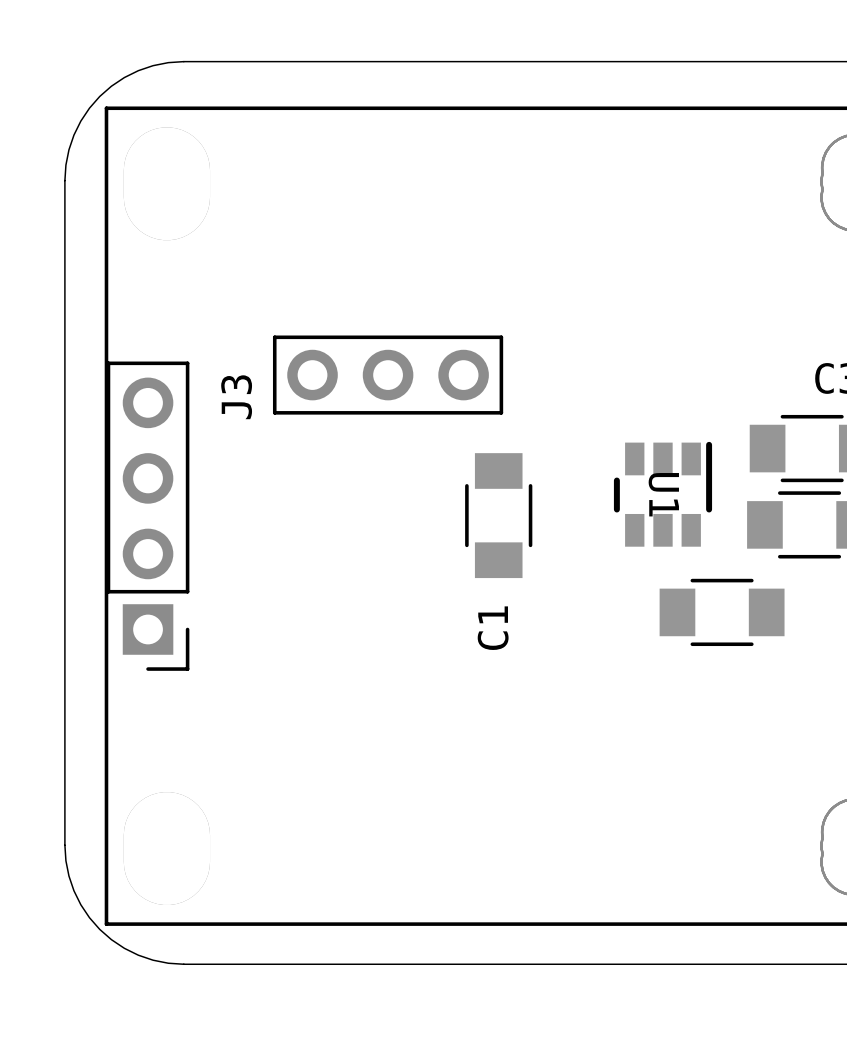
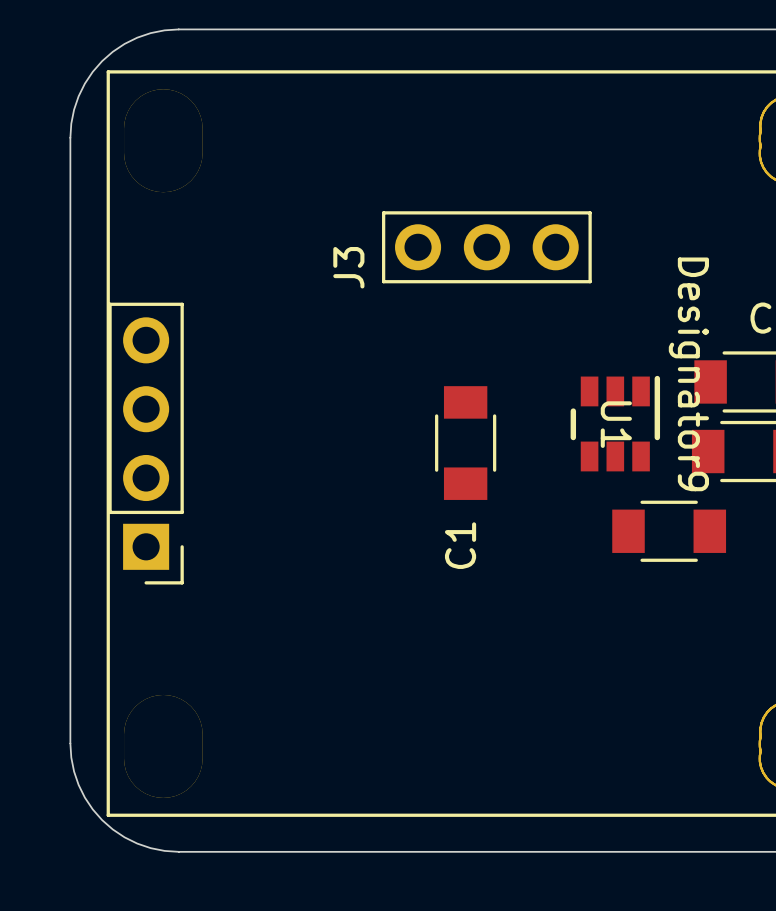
J3 position: (388, 375) -> (486, 247)
U1 text: none -> Designator9 (688, 374)

